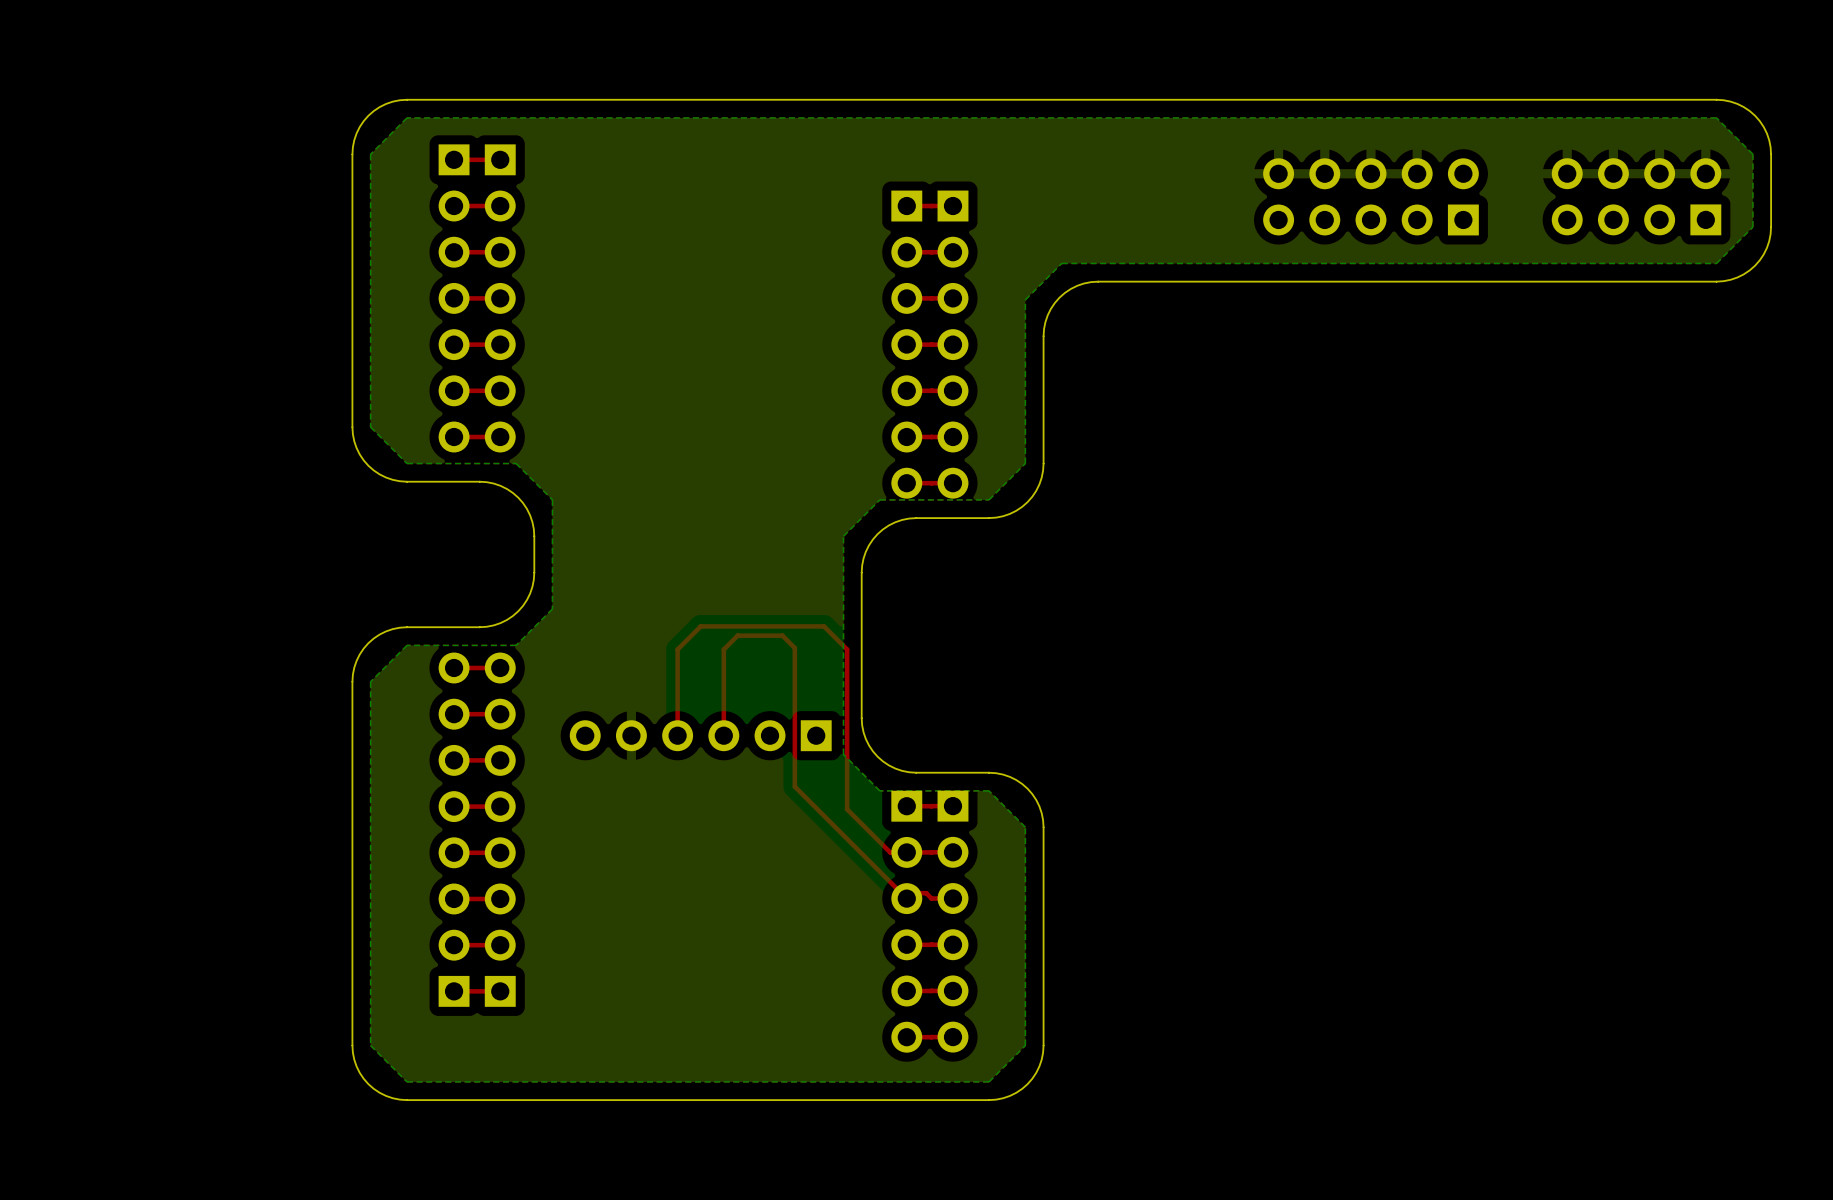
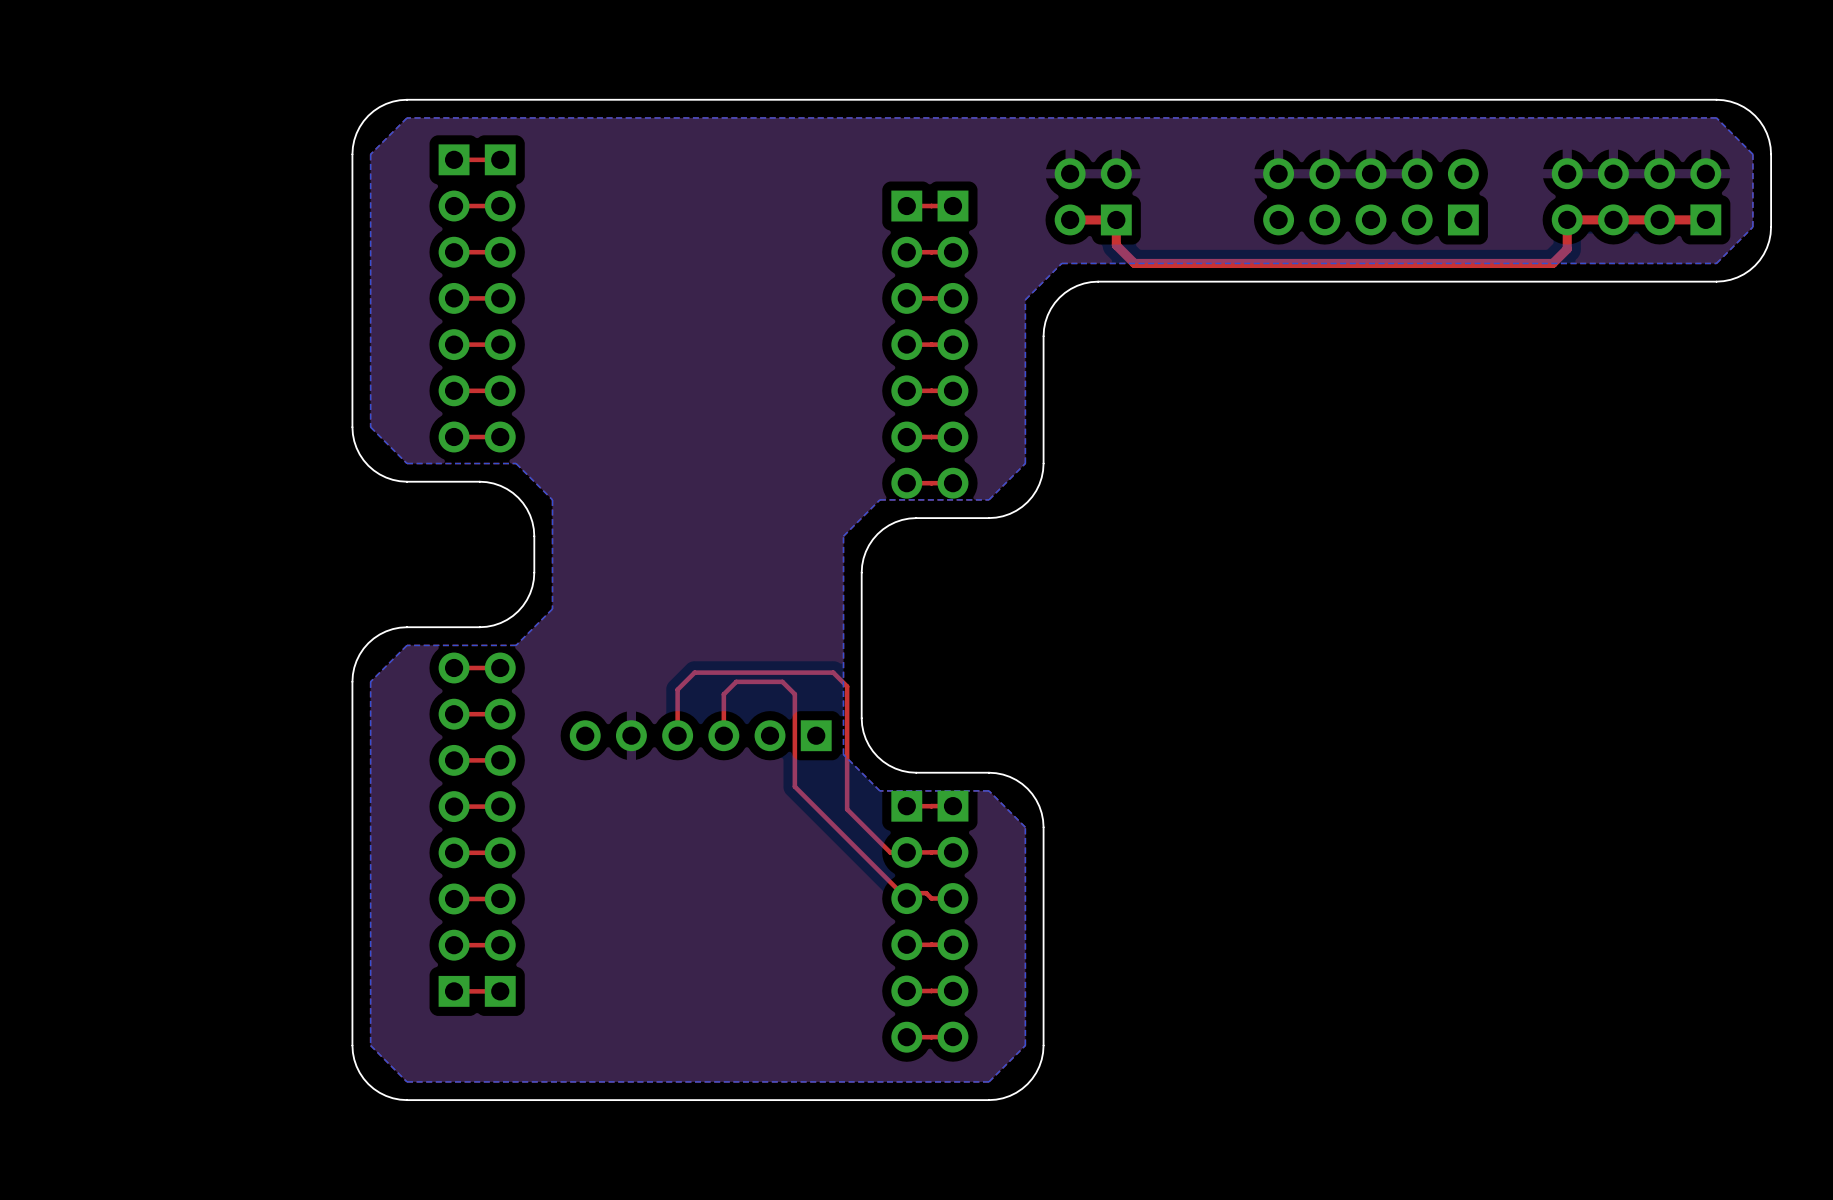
part: none -> (1093, 196)
top track: none -> (1705, 219) (1567, 219) (1567, 249) (1552, 263) (1134, 263) (1116, 245) (1116, 219) (1070, 219)
top track: (847, 686) (847, 649) (824, 626) (700, 626) (677, 649) (677, 689) -> (847, 686) (833, 672) (694, 672) (677, 689)
top track: (794, 694) (794, 648) (782, 635) (737, 635) (723, 649) (723, 694) -> (794, 694) (782, 681) (736, 681) (723, 694)

